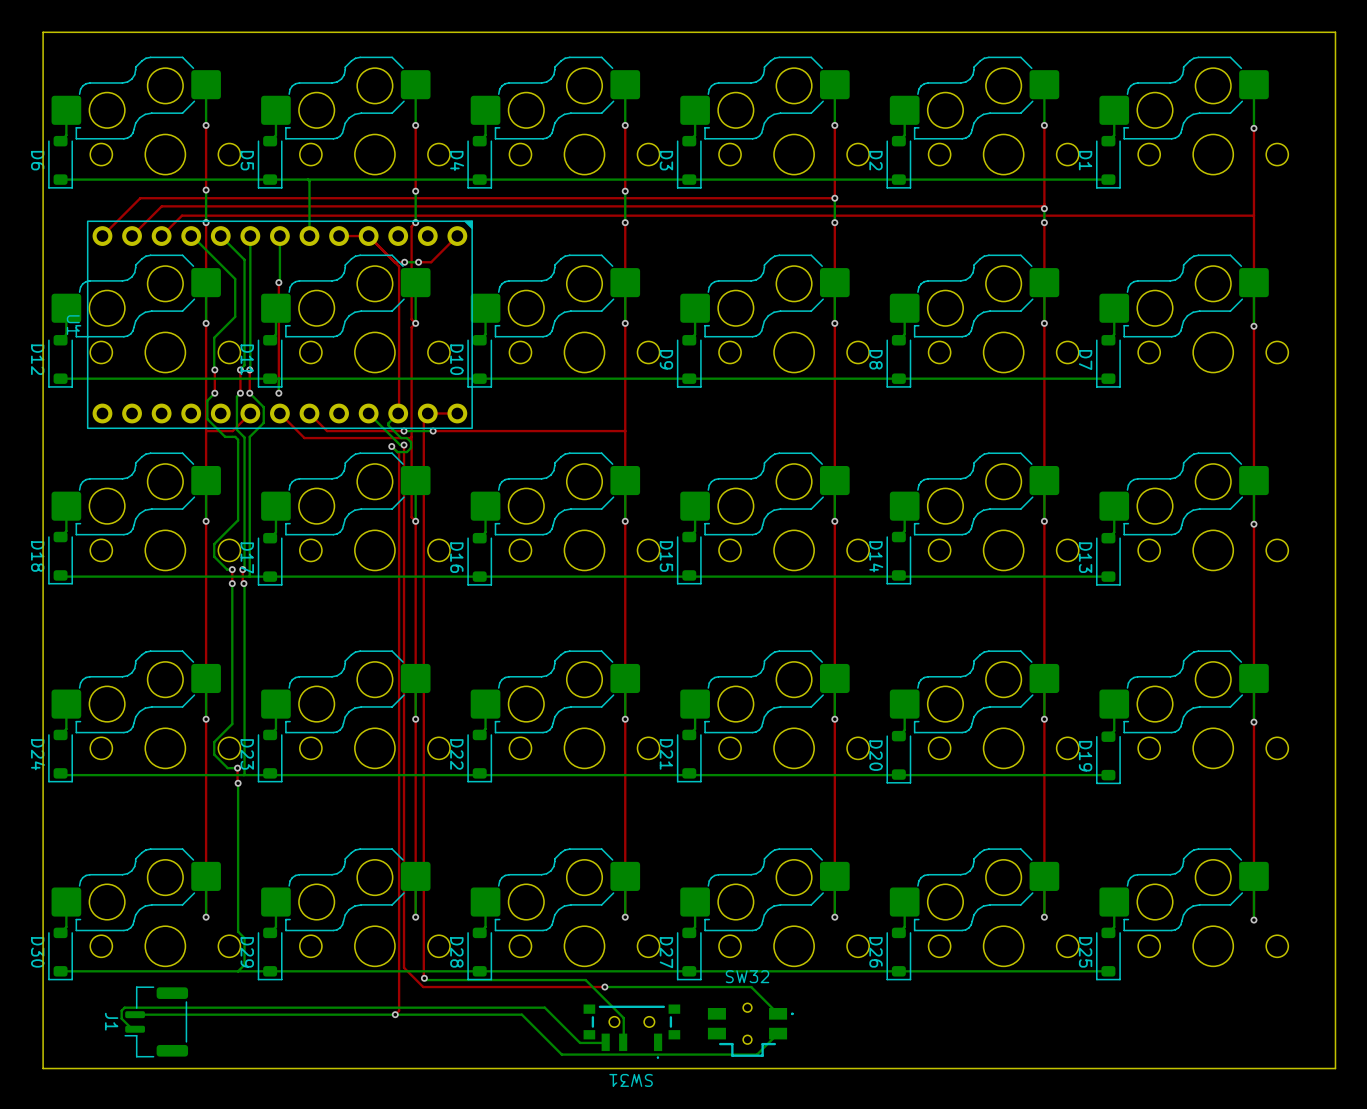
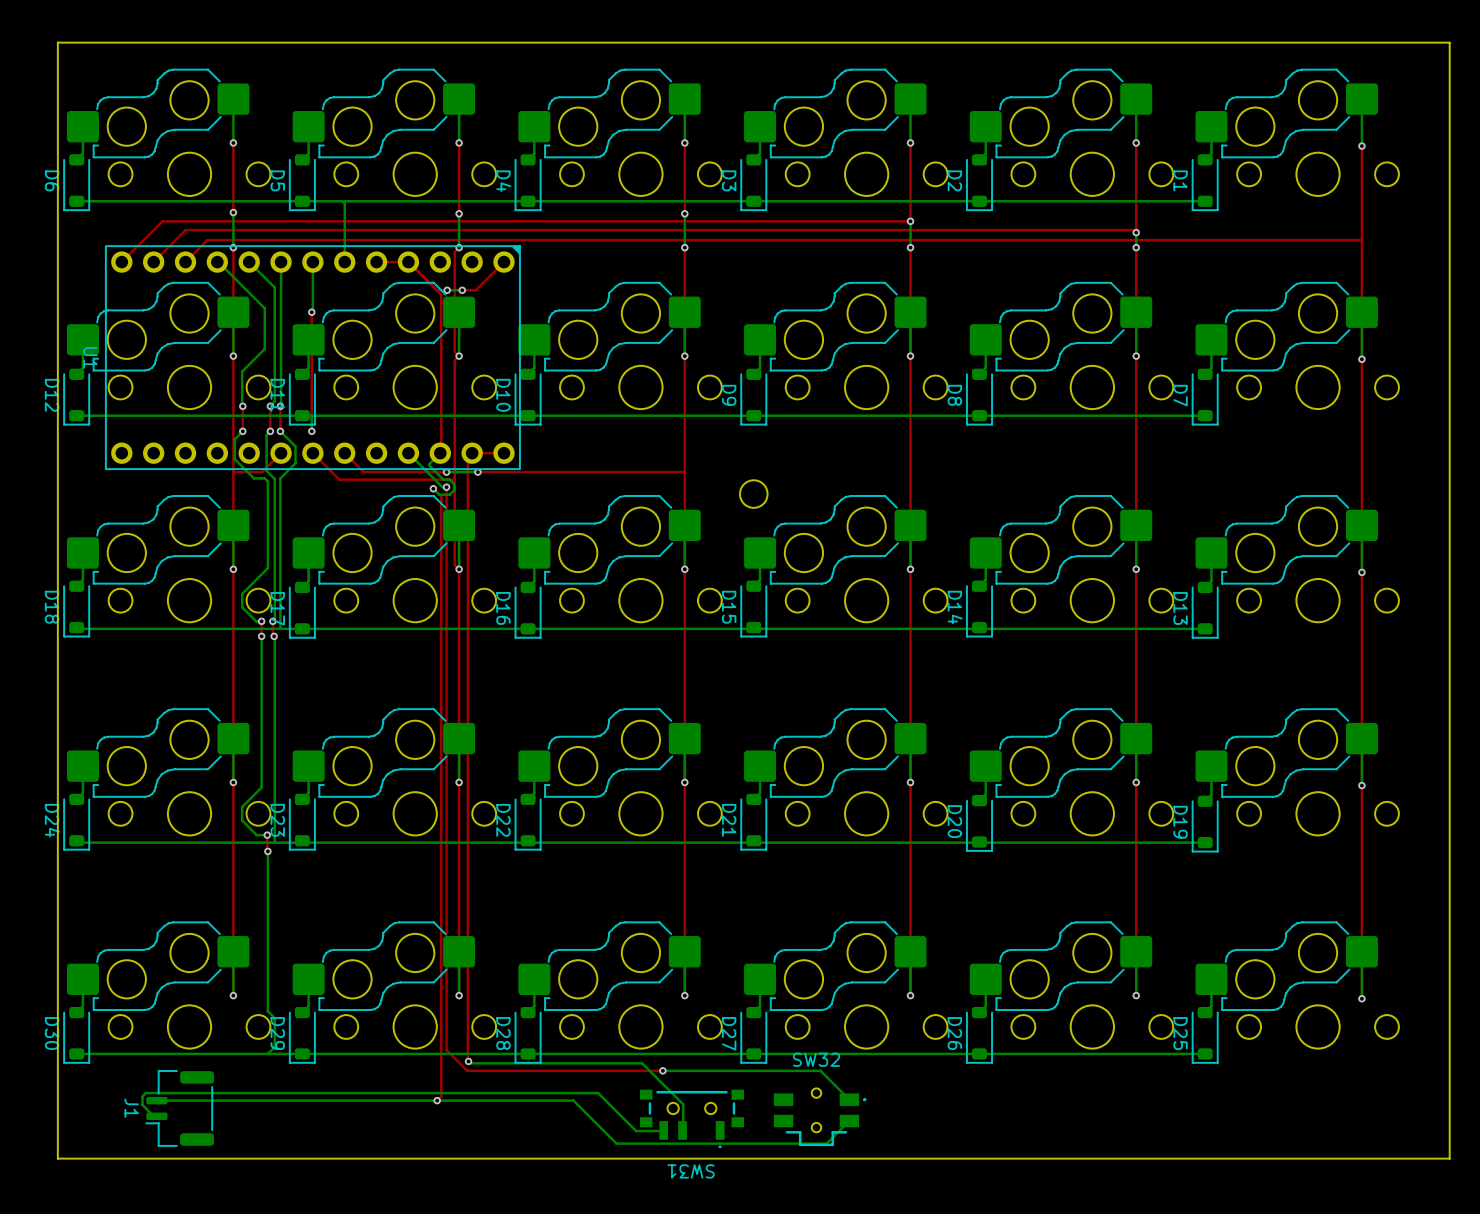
round board edge: none -> [739, 479, 768, 509]

